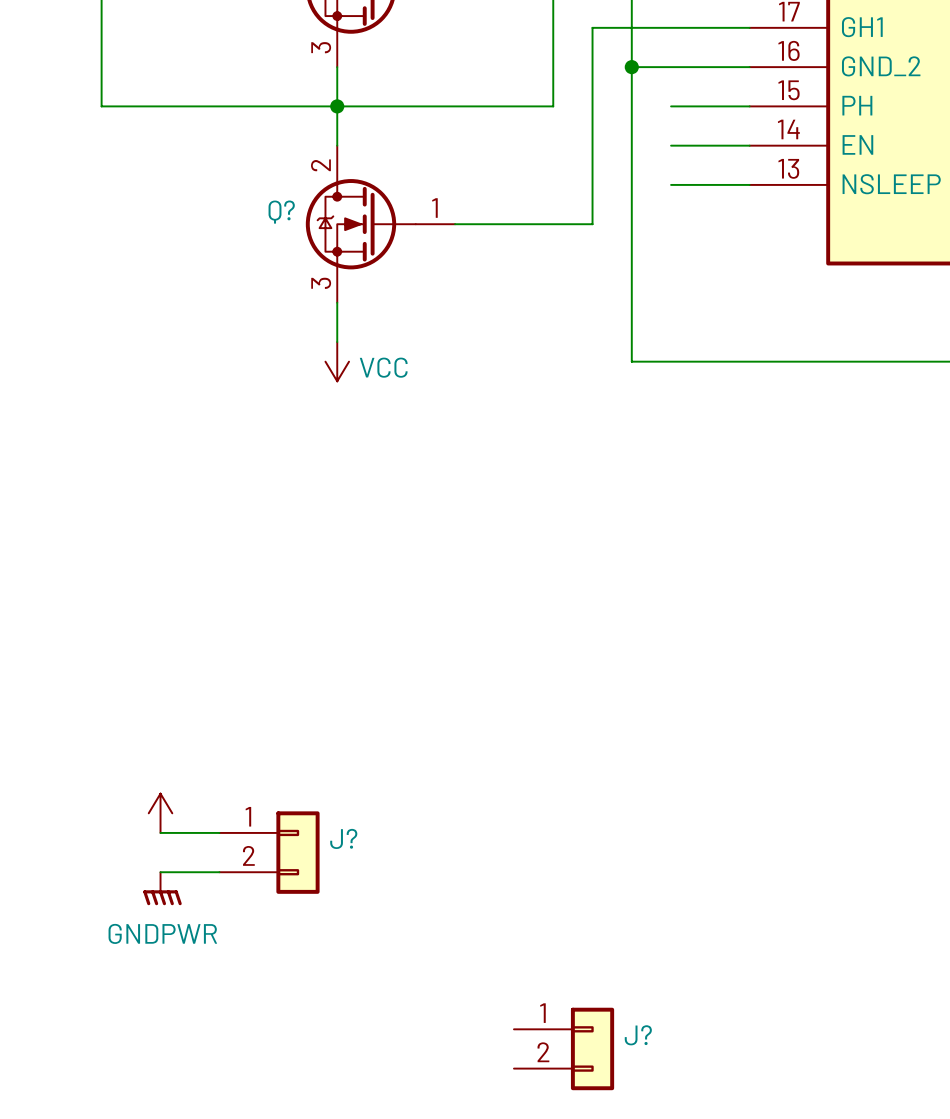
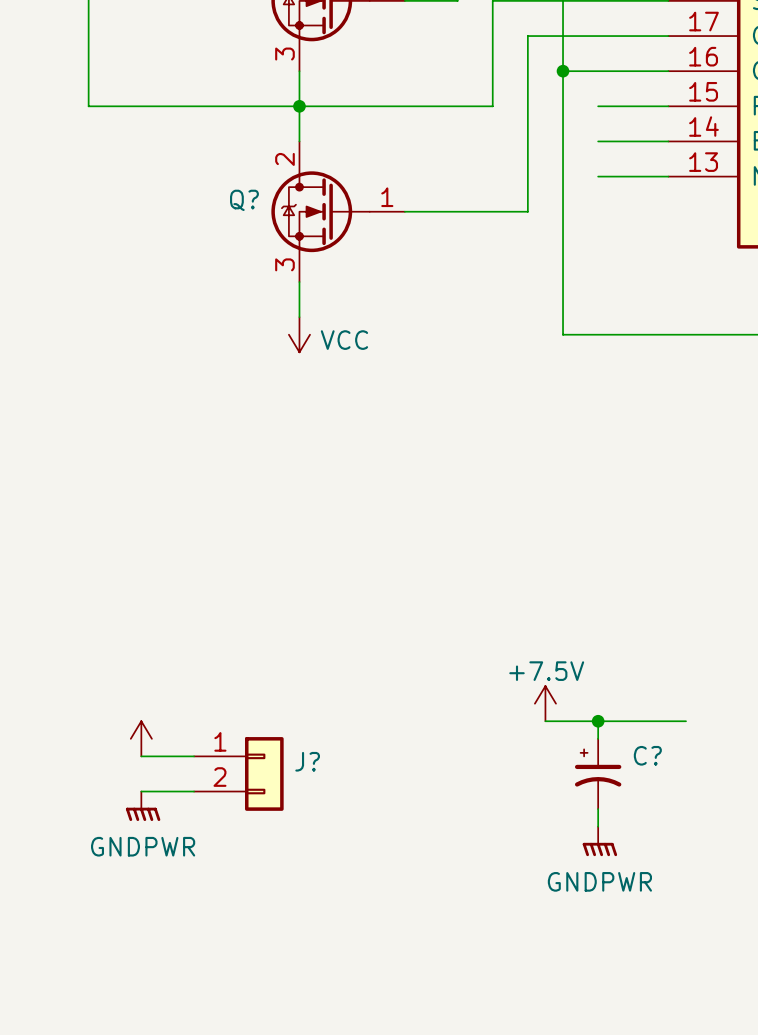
power symbol: none -> +7.5V (545, 703)
wire: none -> (545, 721) (686, 721)
wire: none -> (598, 721) (598, 738)
junction: none -> (598, 721)
C?: none -> (598, 773)
wire: none -> (598, 809) (598, 826)
power symbol: none -> GNDPWR (599, 841)
J?: (564, 1048) -> none

